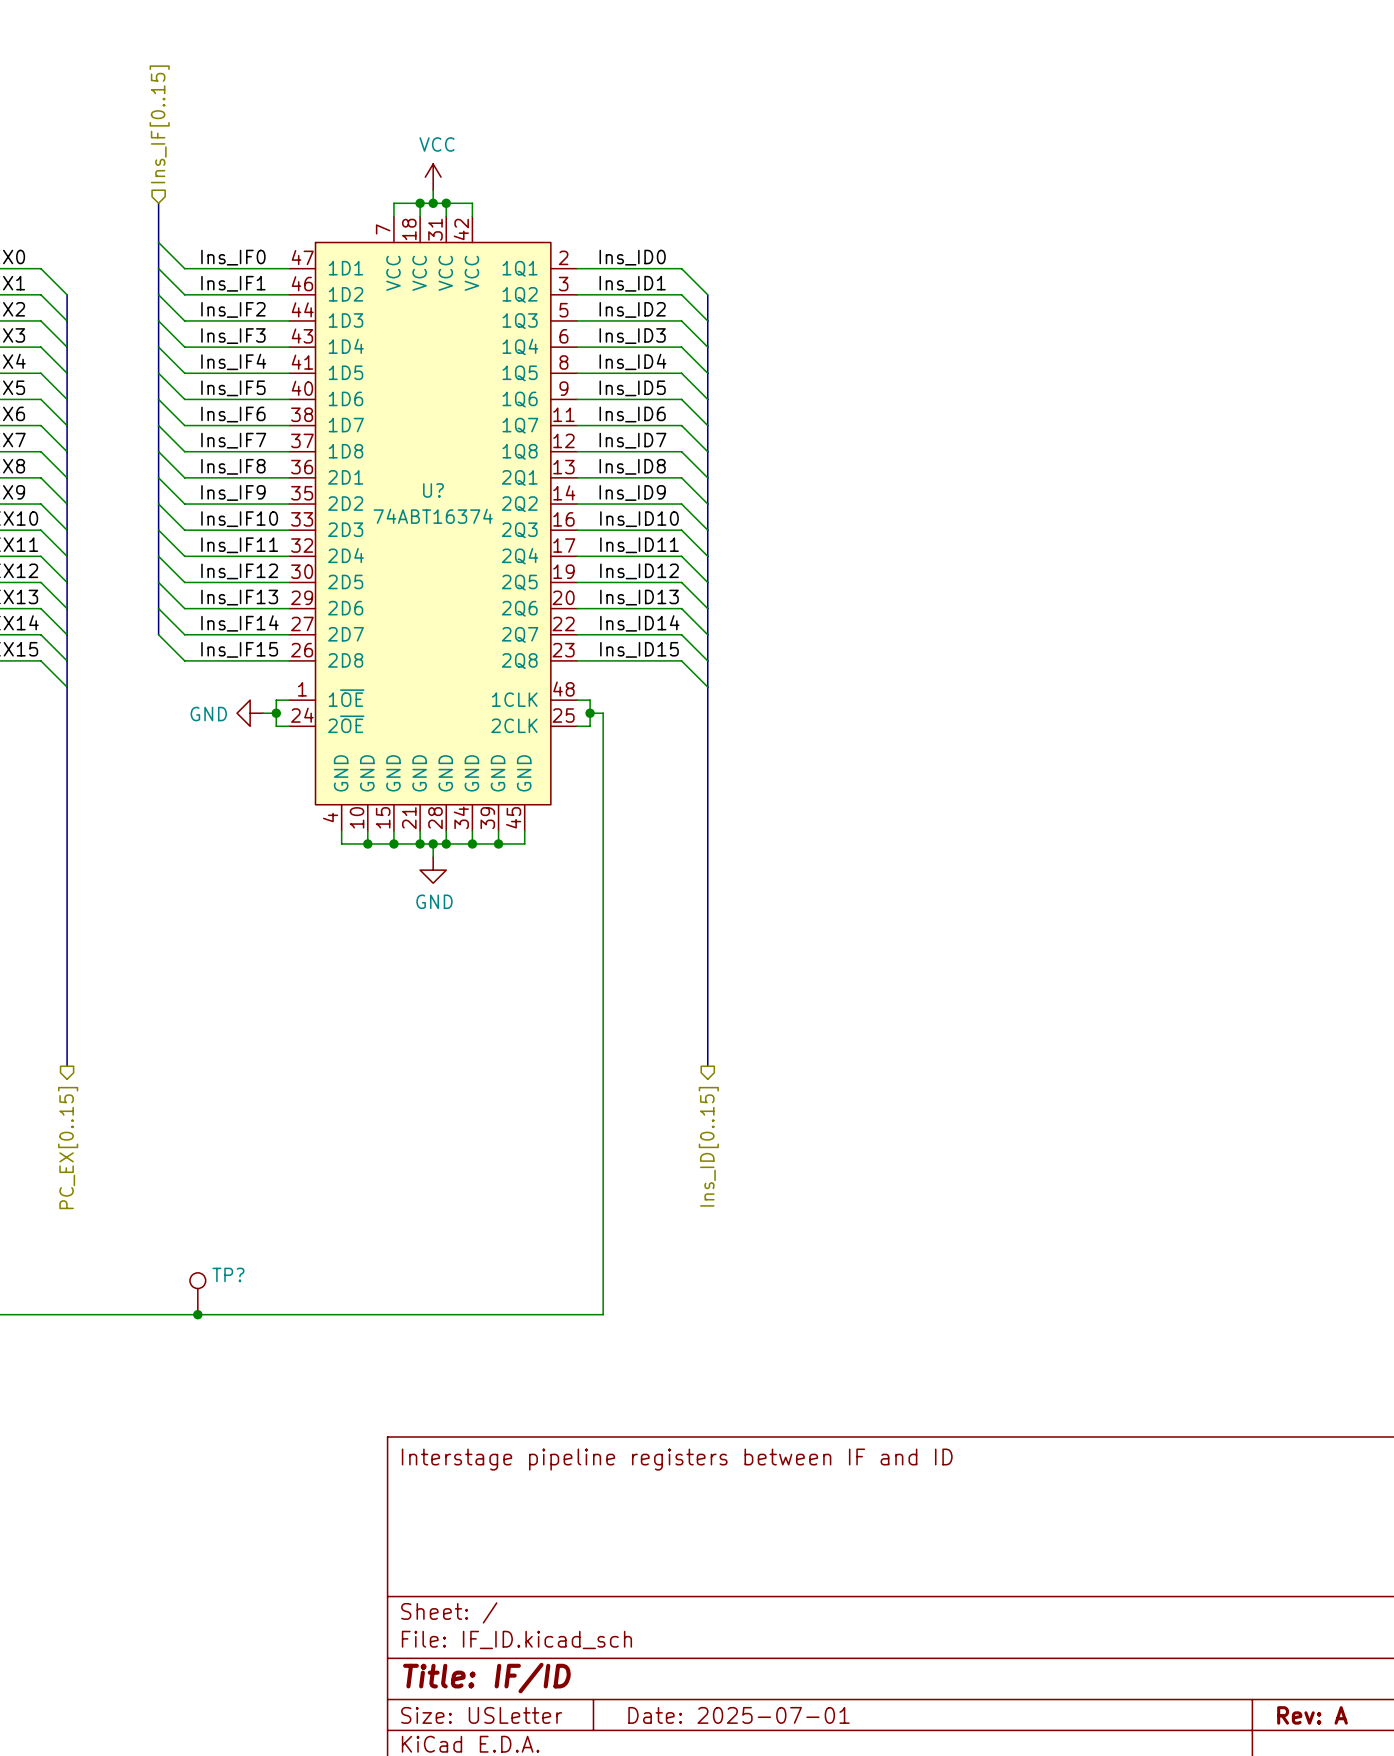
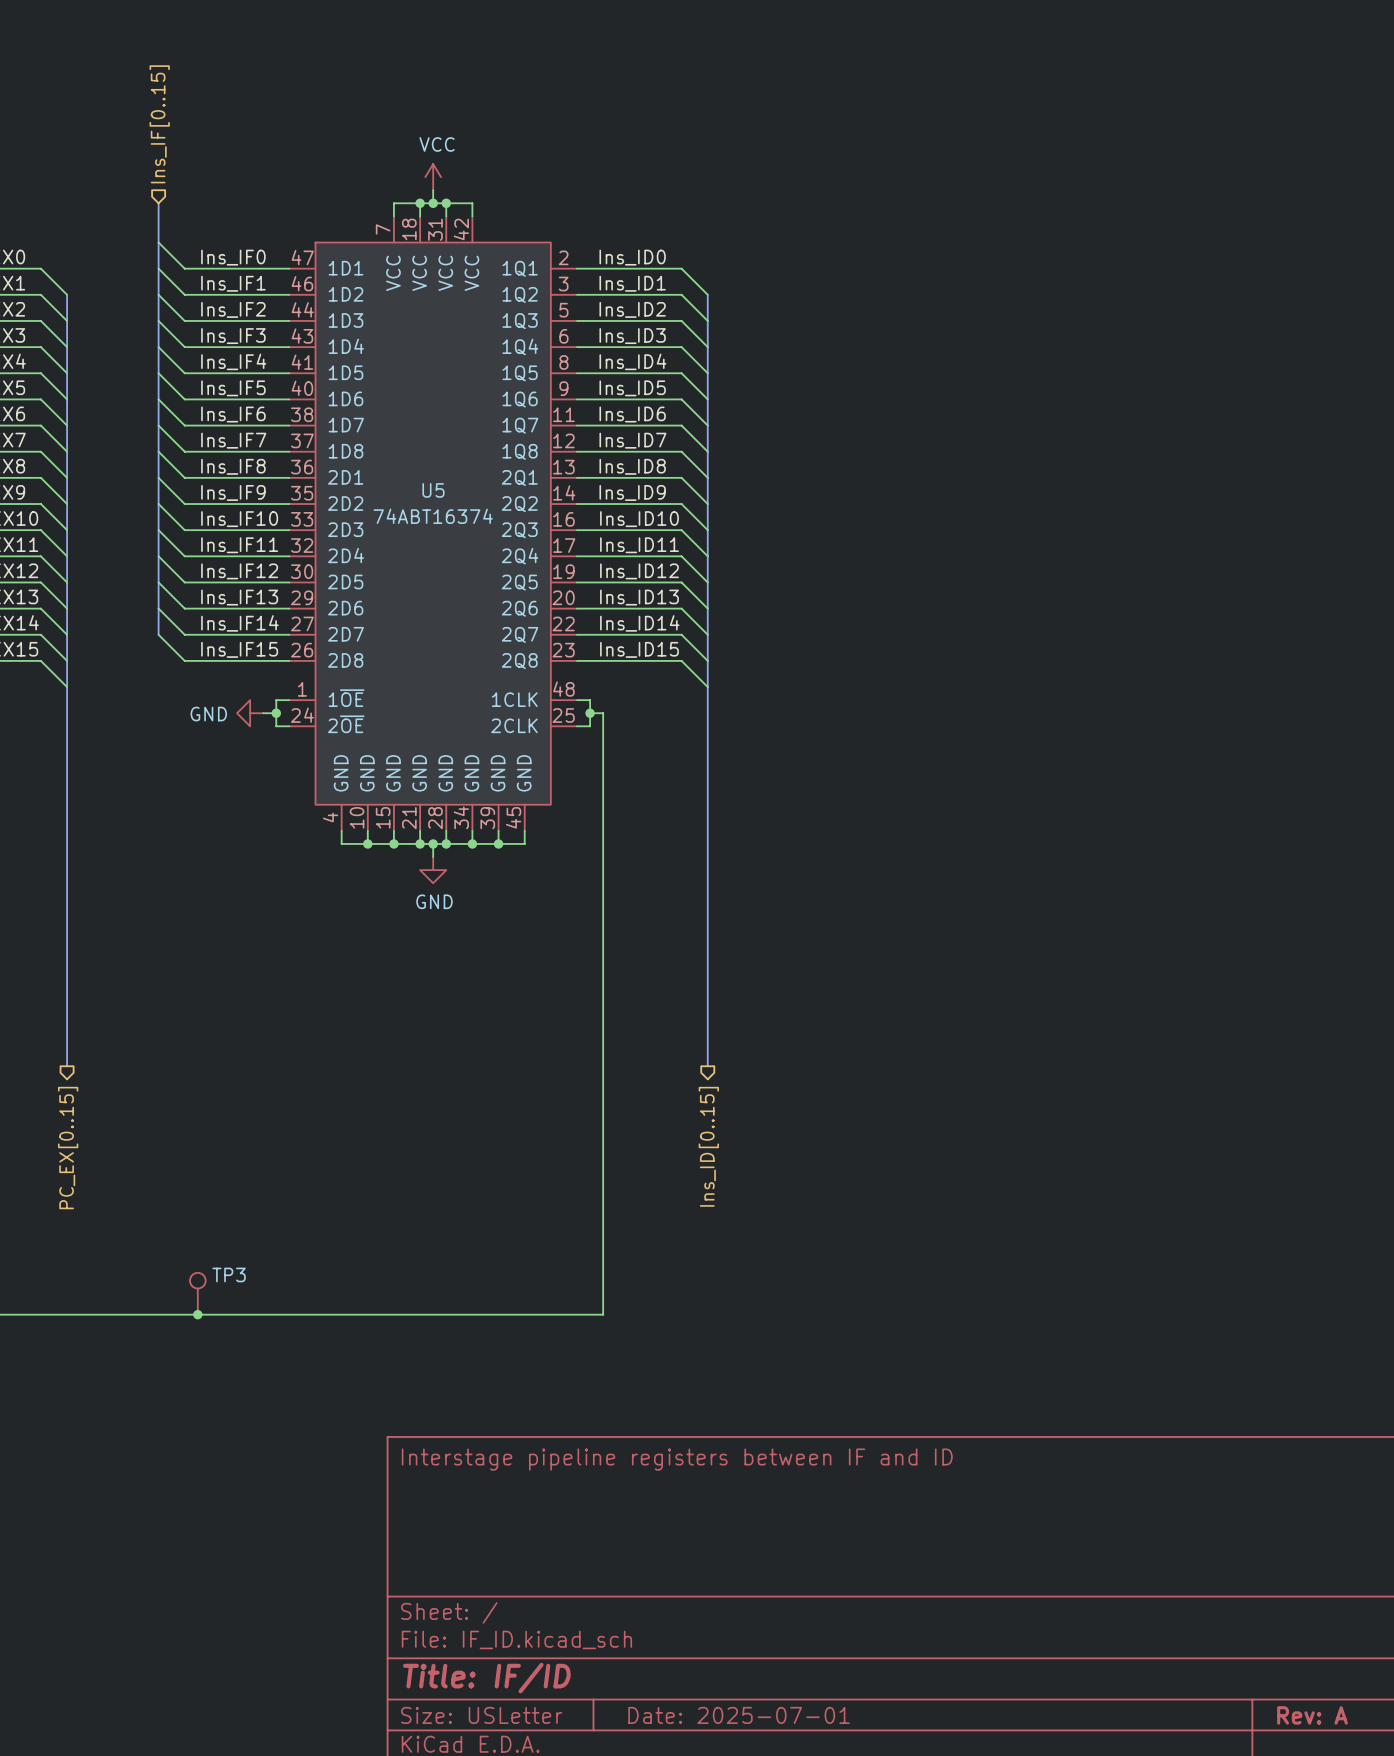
U? name: U? (433, 490) -> U5 (433, 490)
TP? name: TP? (228, 1274) -> TP3 (229, 1274)

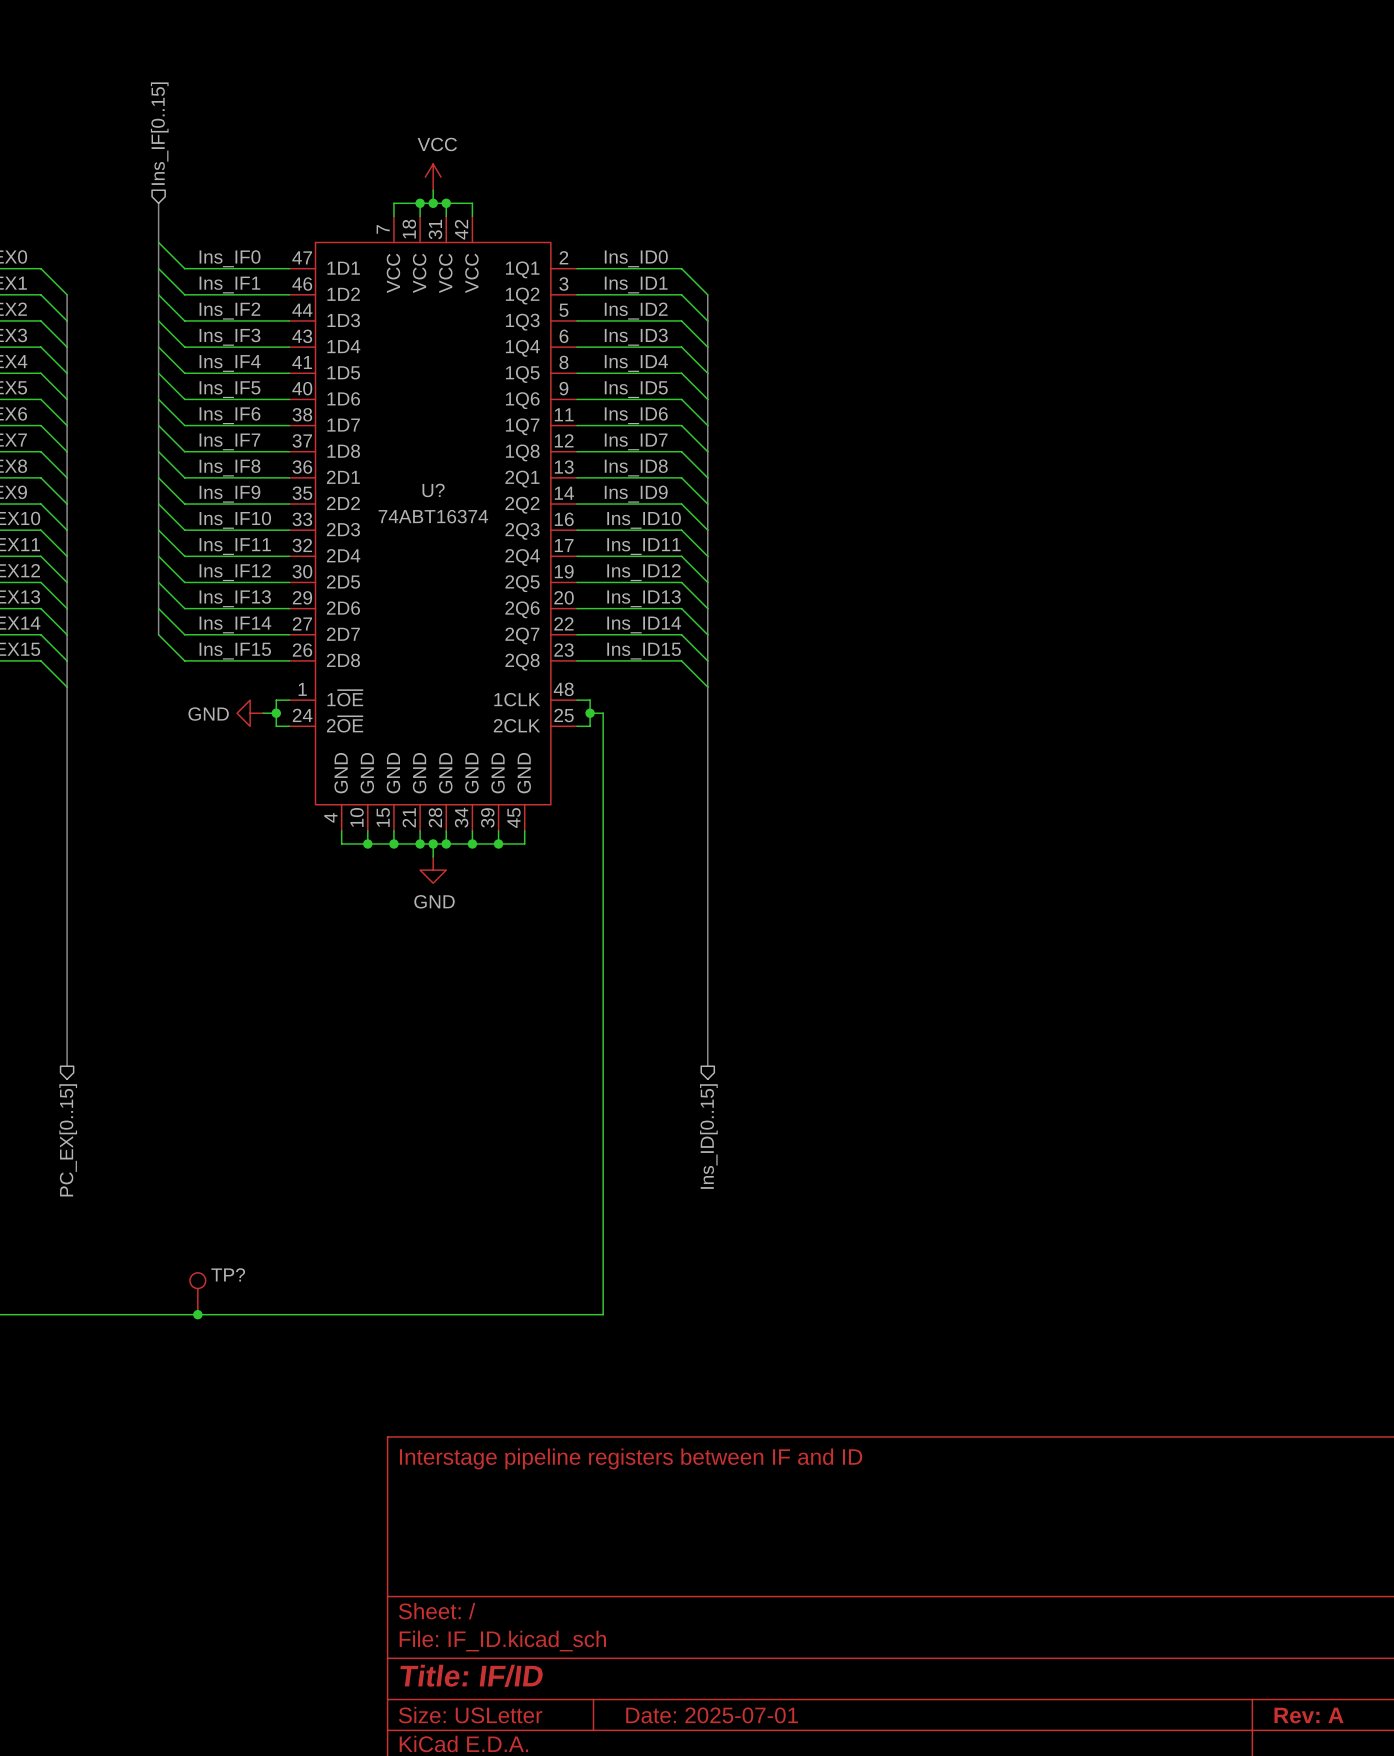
U5 name: U5 (433, 490) -> U? (433, 490)
TP3 name: TP3 (229, 1274) -> TP? (228, 1274)

